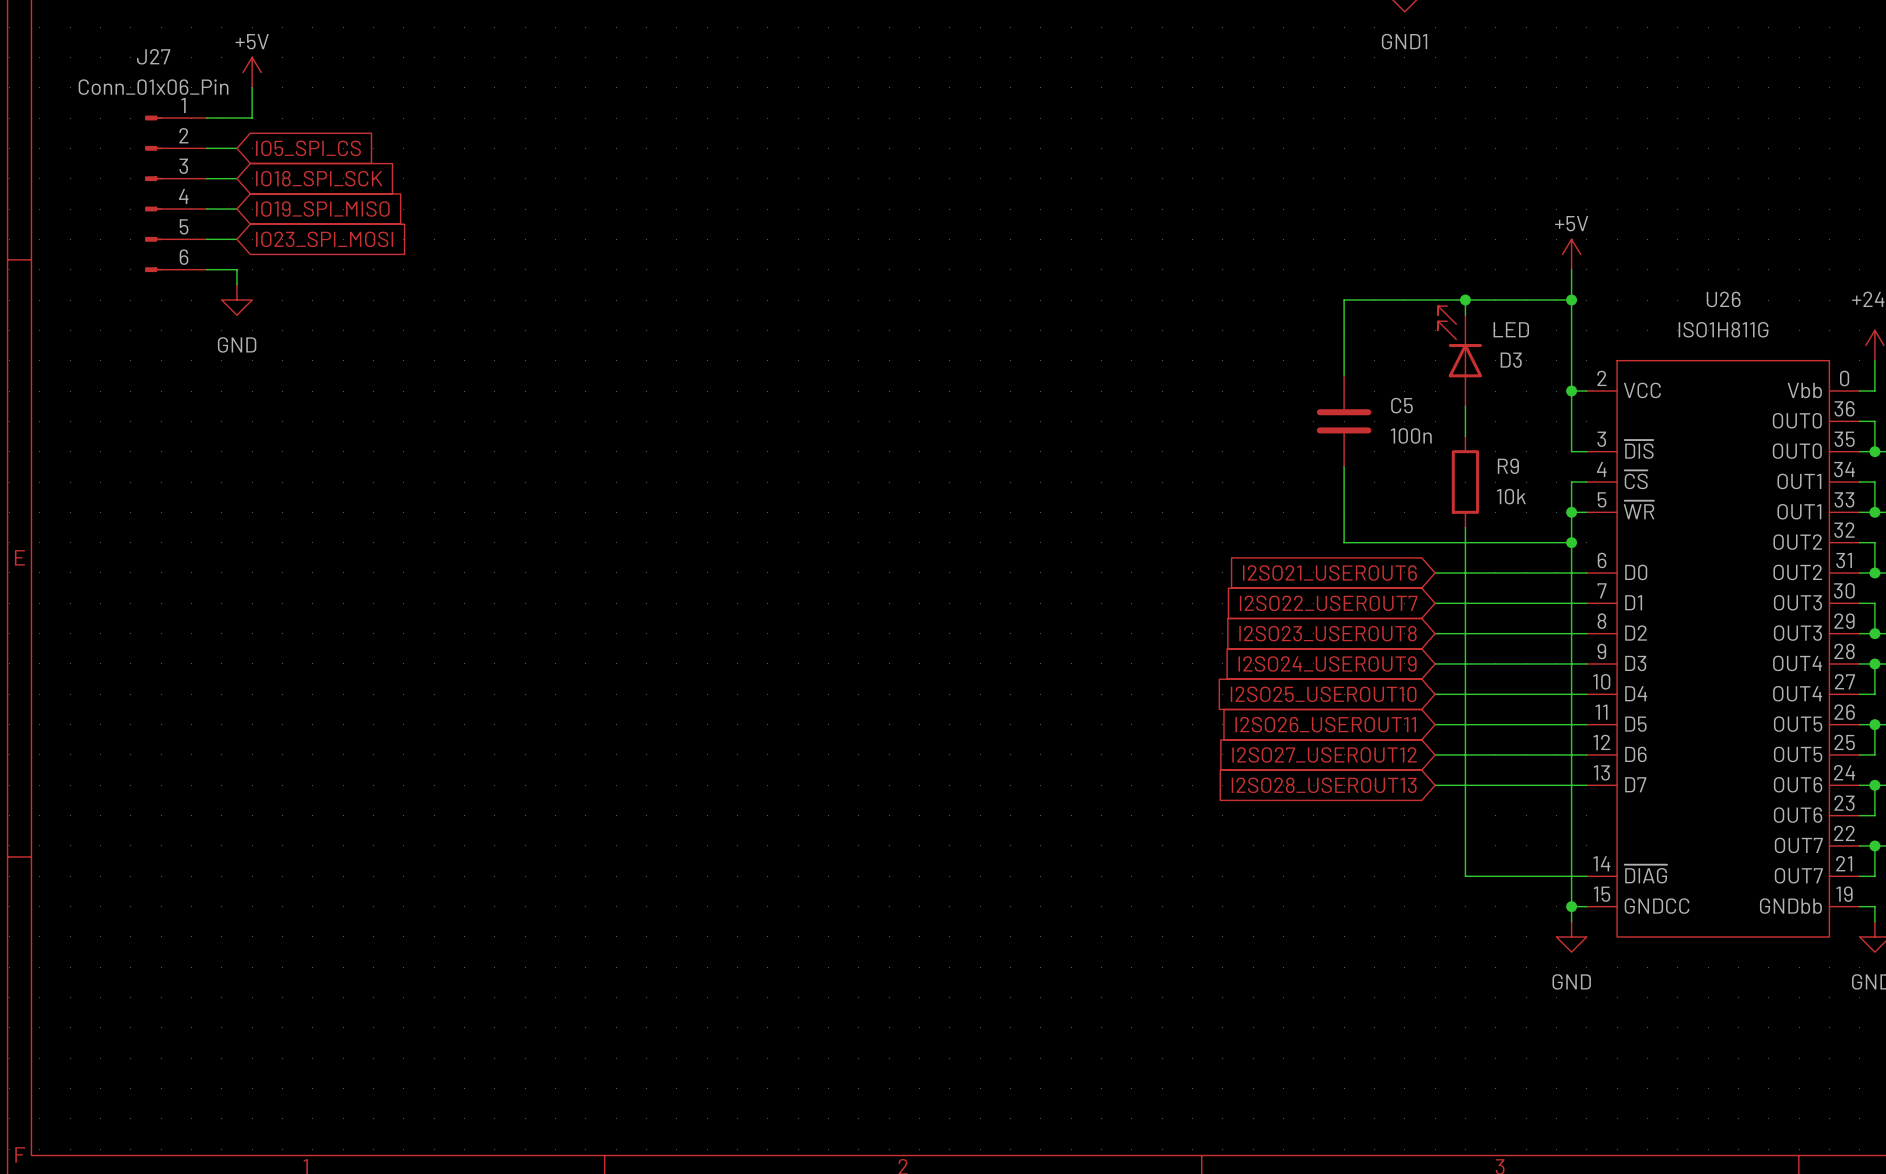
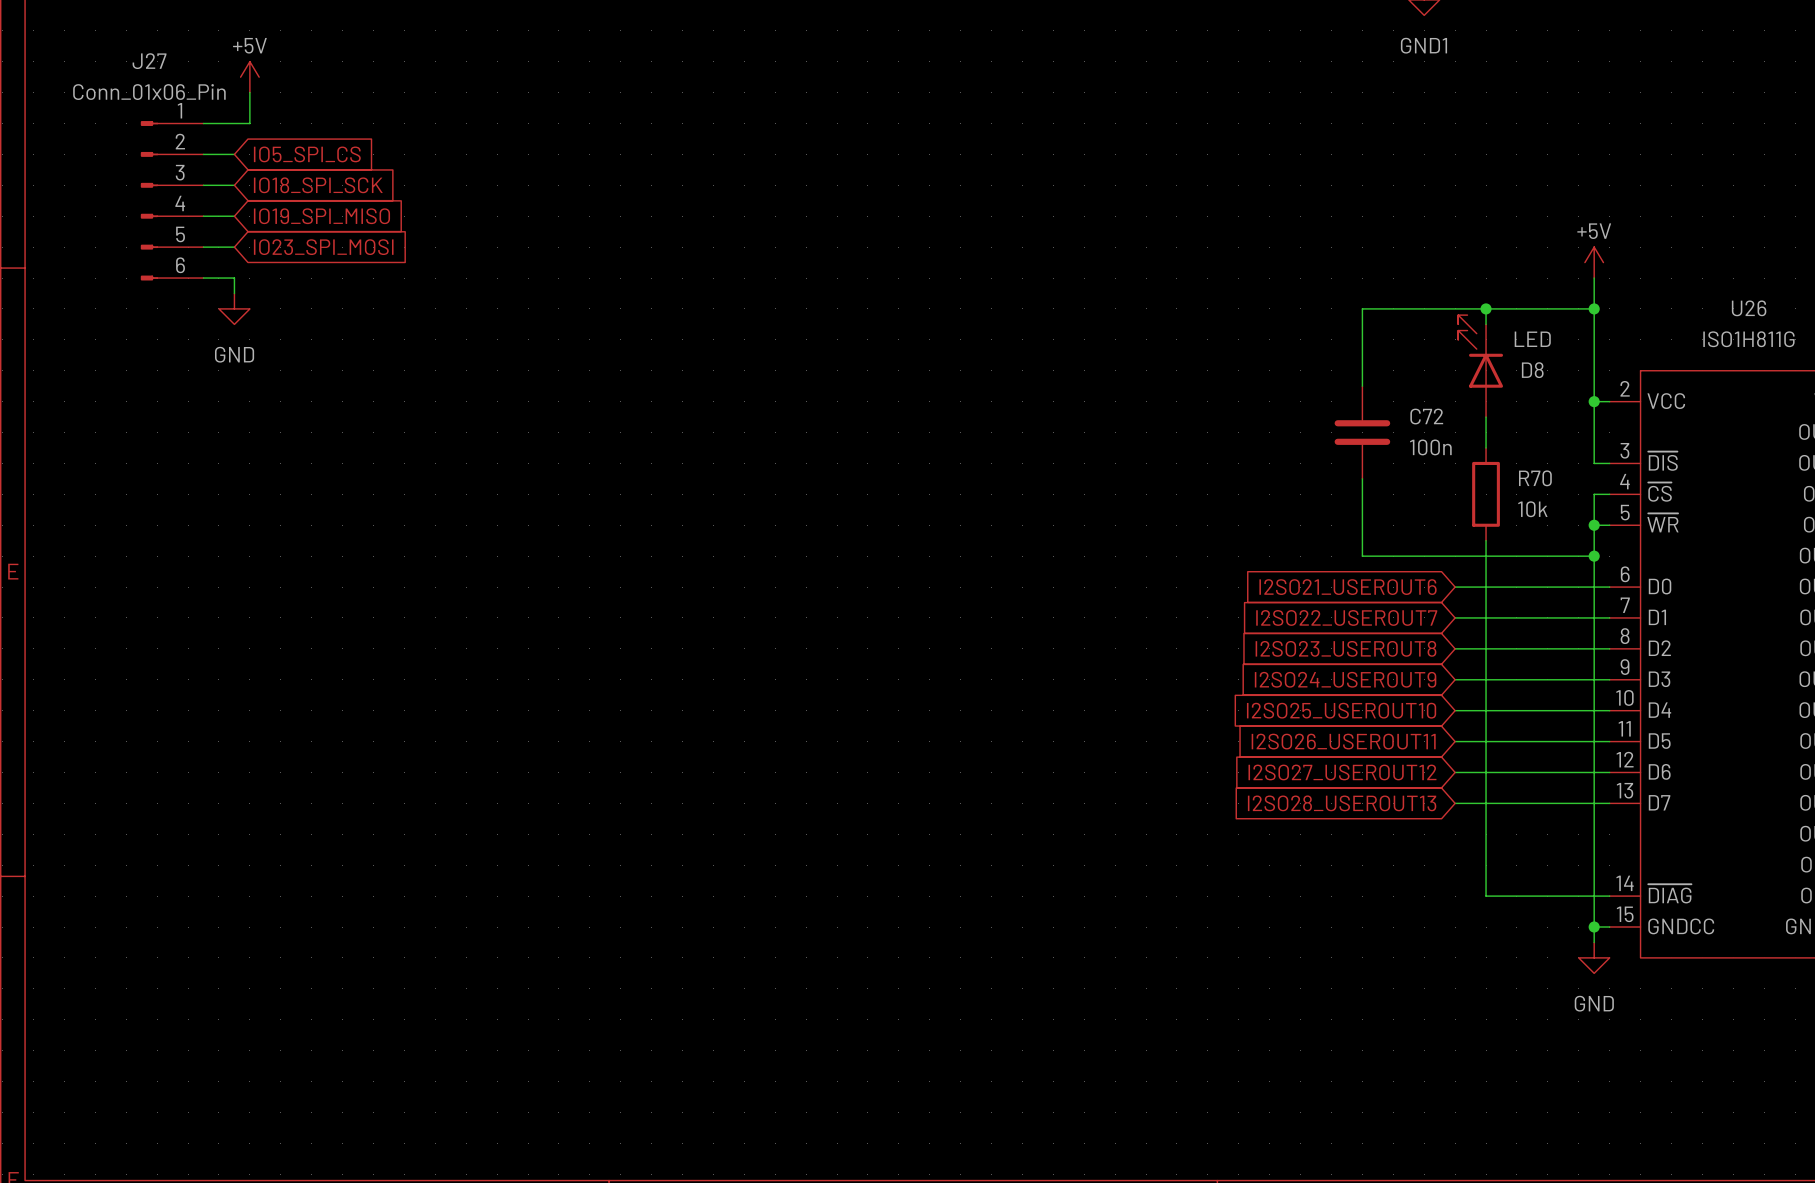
D3 name: D3 (1511, 360) -> D8 (1532, 370)
C5 name: C5 (1401, 405) -> C72 (1426, 416)
R9 name: R9 (1508, 466) -> R70 (1535, 478)

